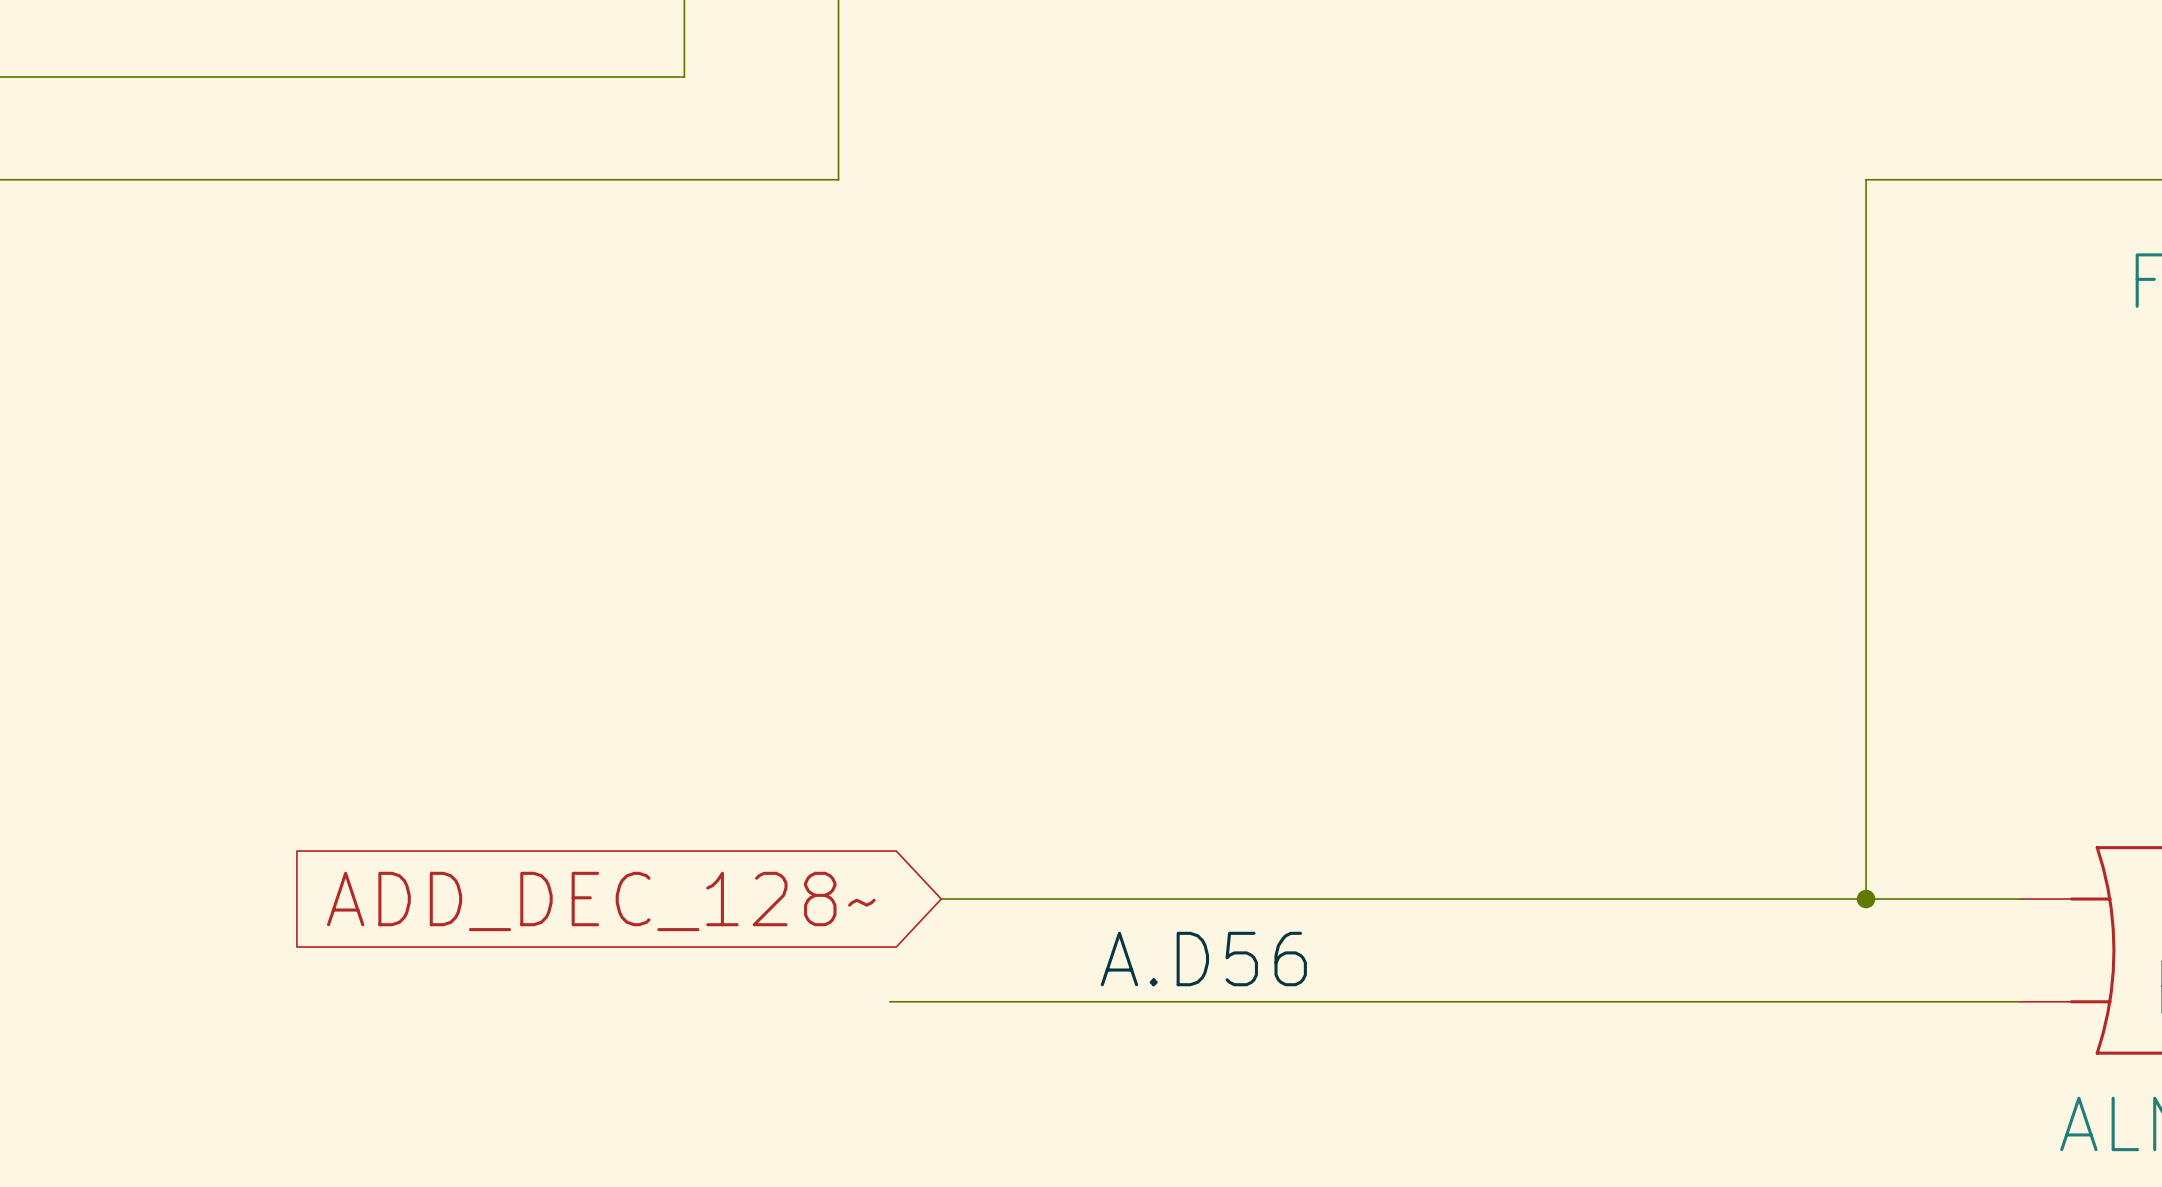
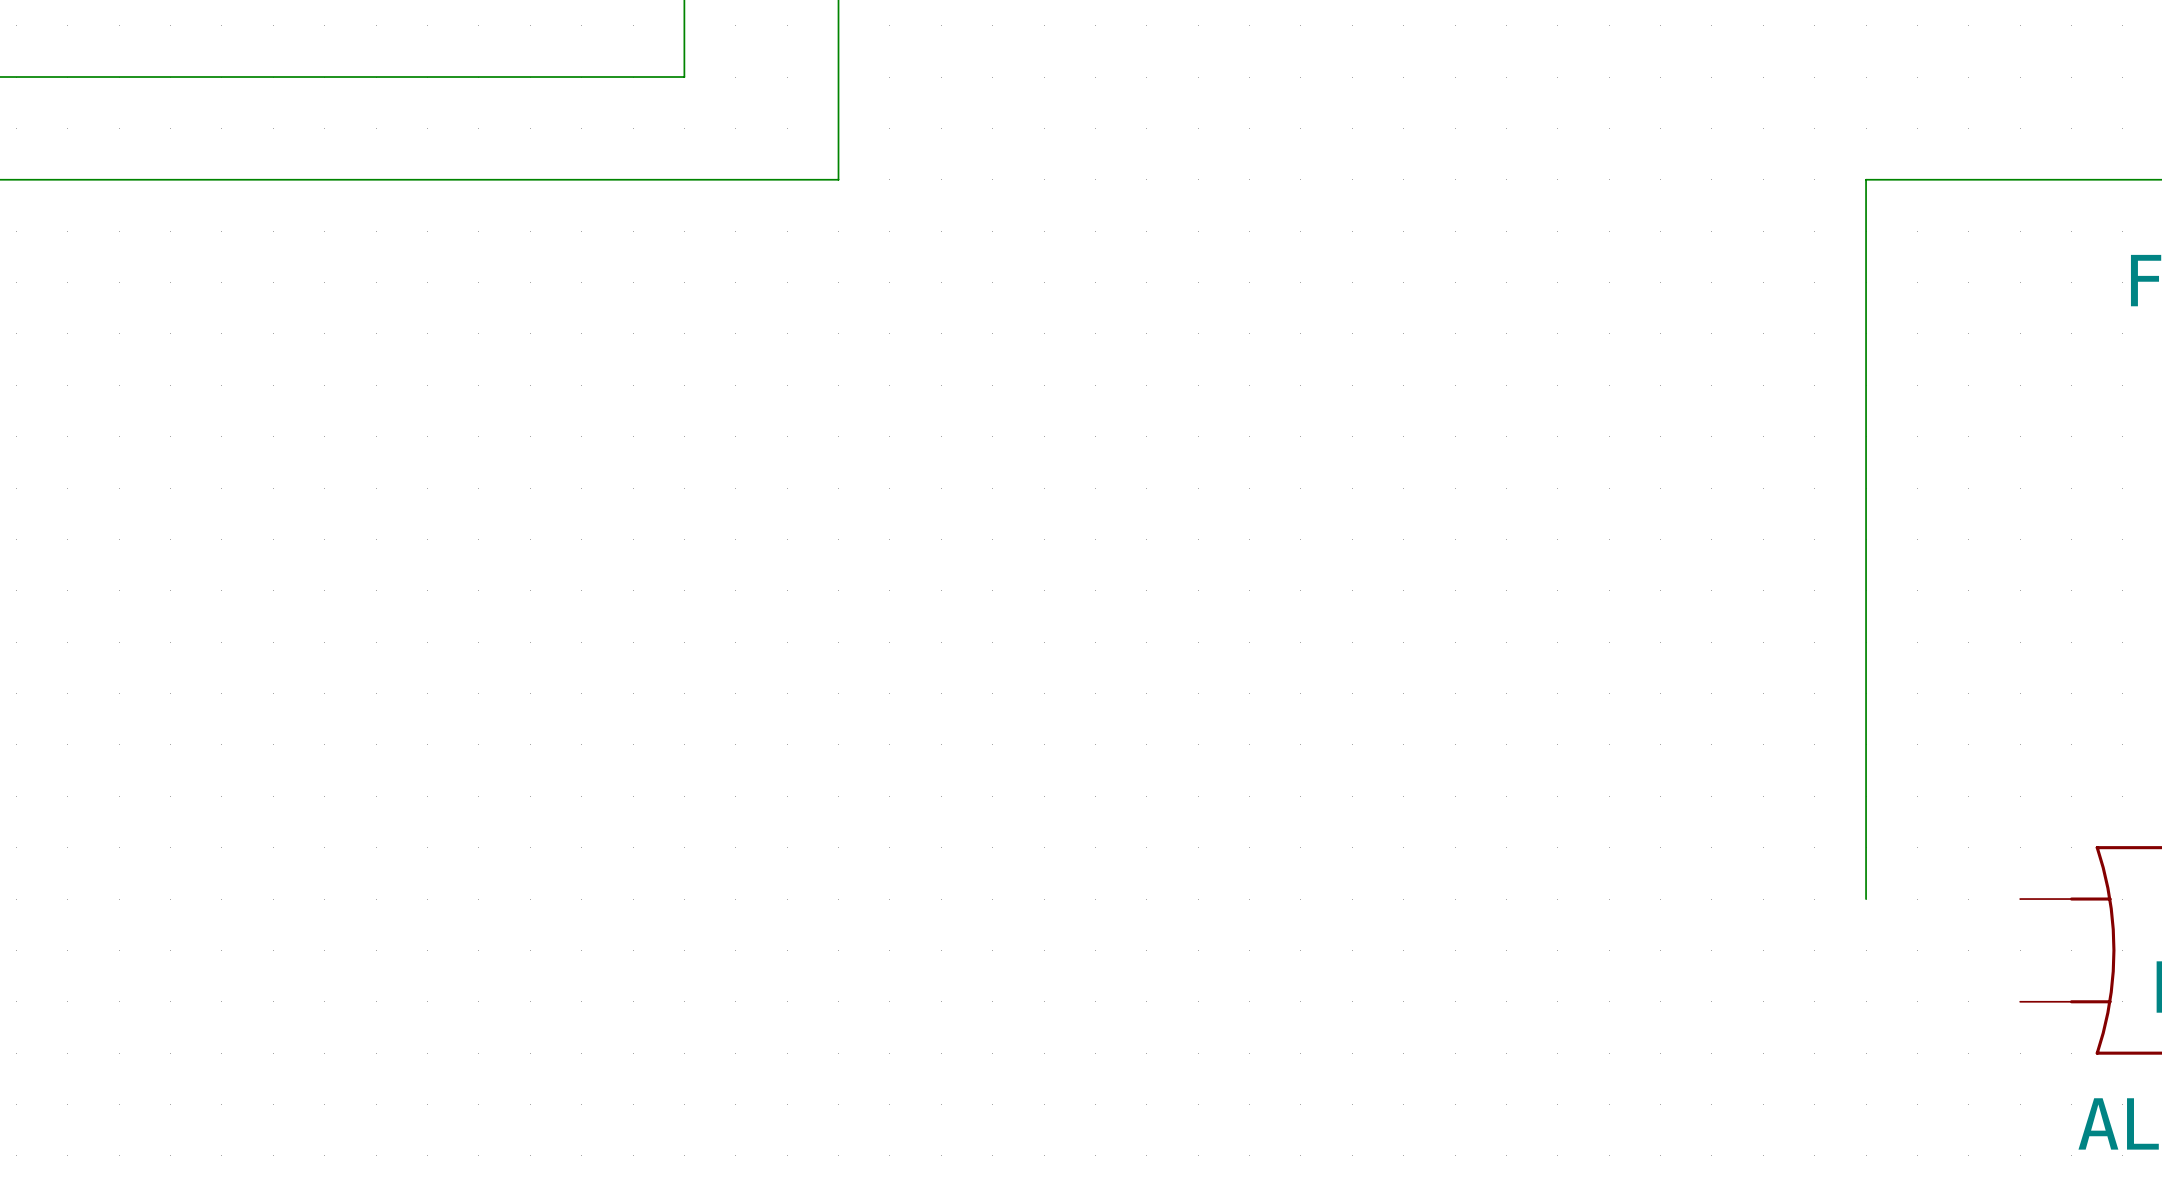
wire: (941, 899) (2020, 899) -> none
junction: (1866, 899) -> none
global label: ADD_DEC_128~ (601, 901) -> none
label: A.D56 (1203, 959) -> none
wire: (889, 1001) (2020, 1001) -> none

